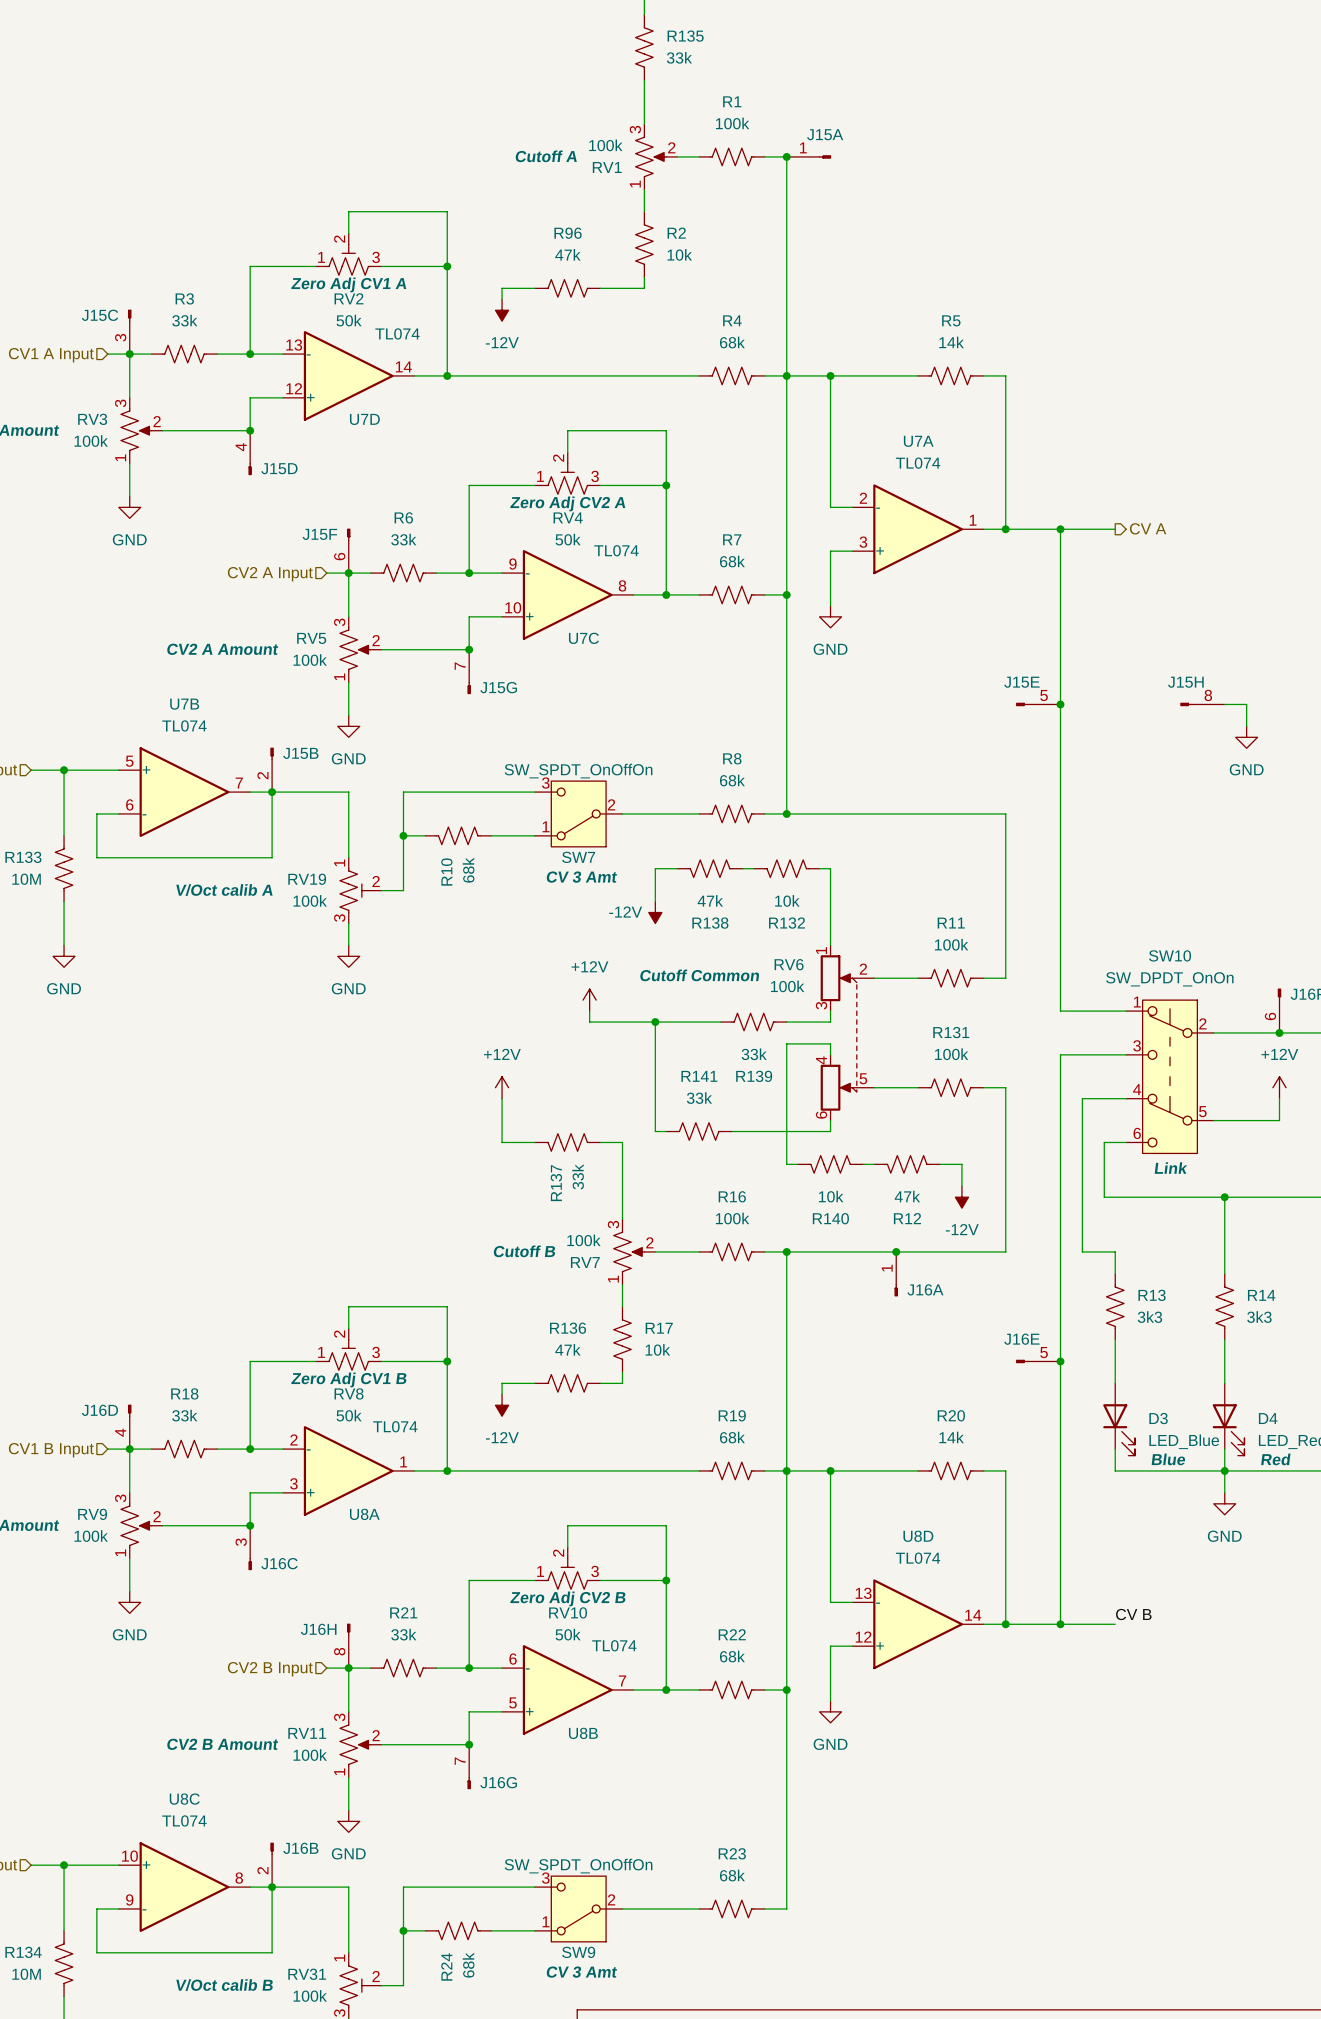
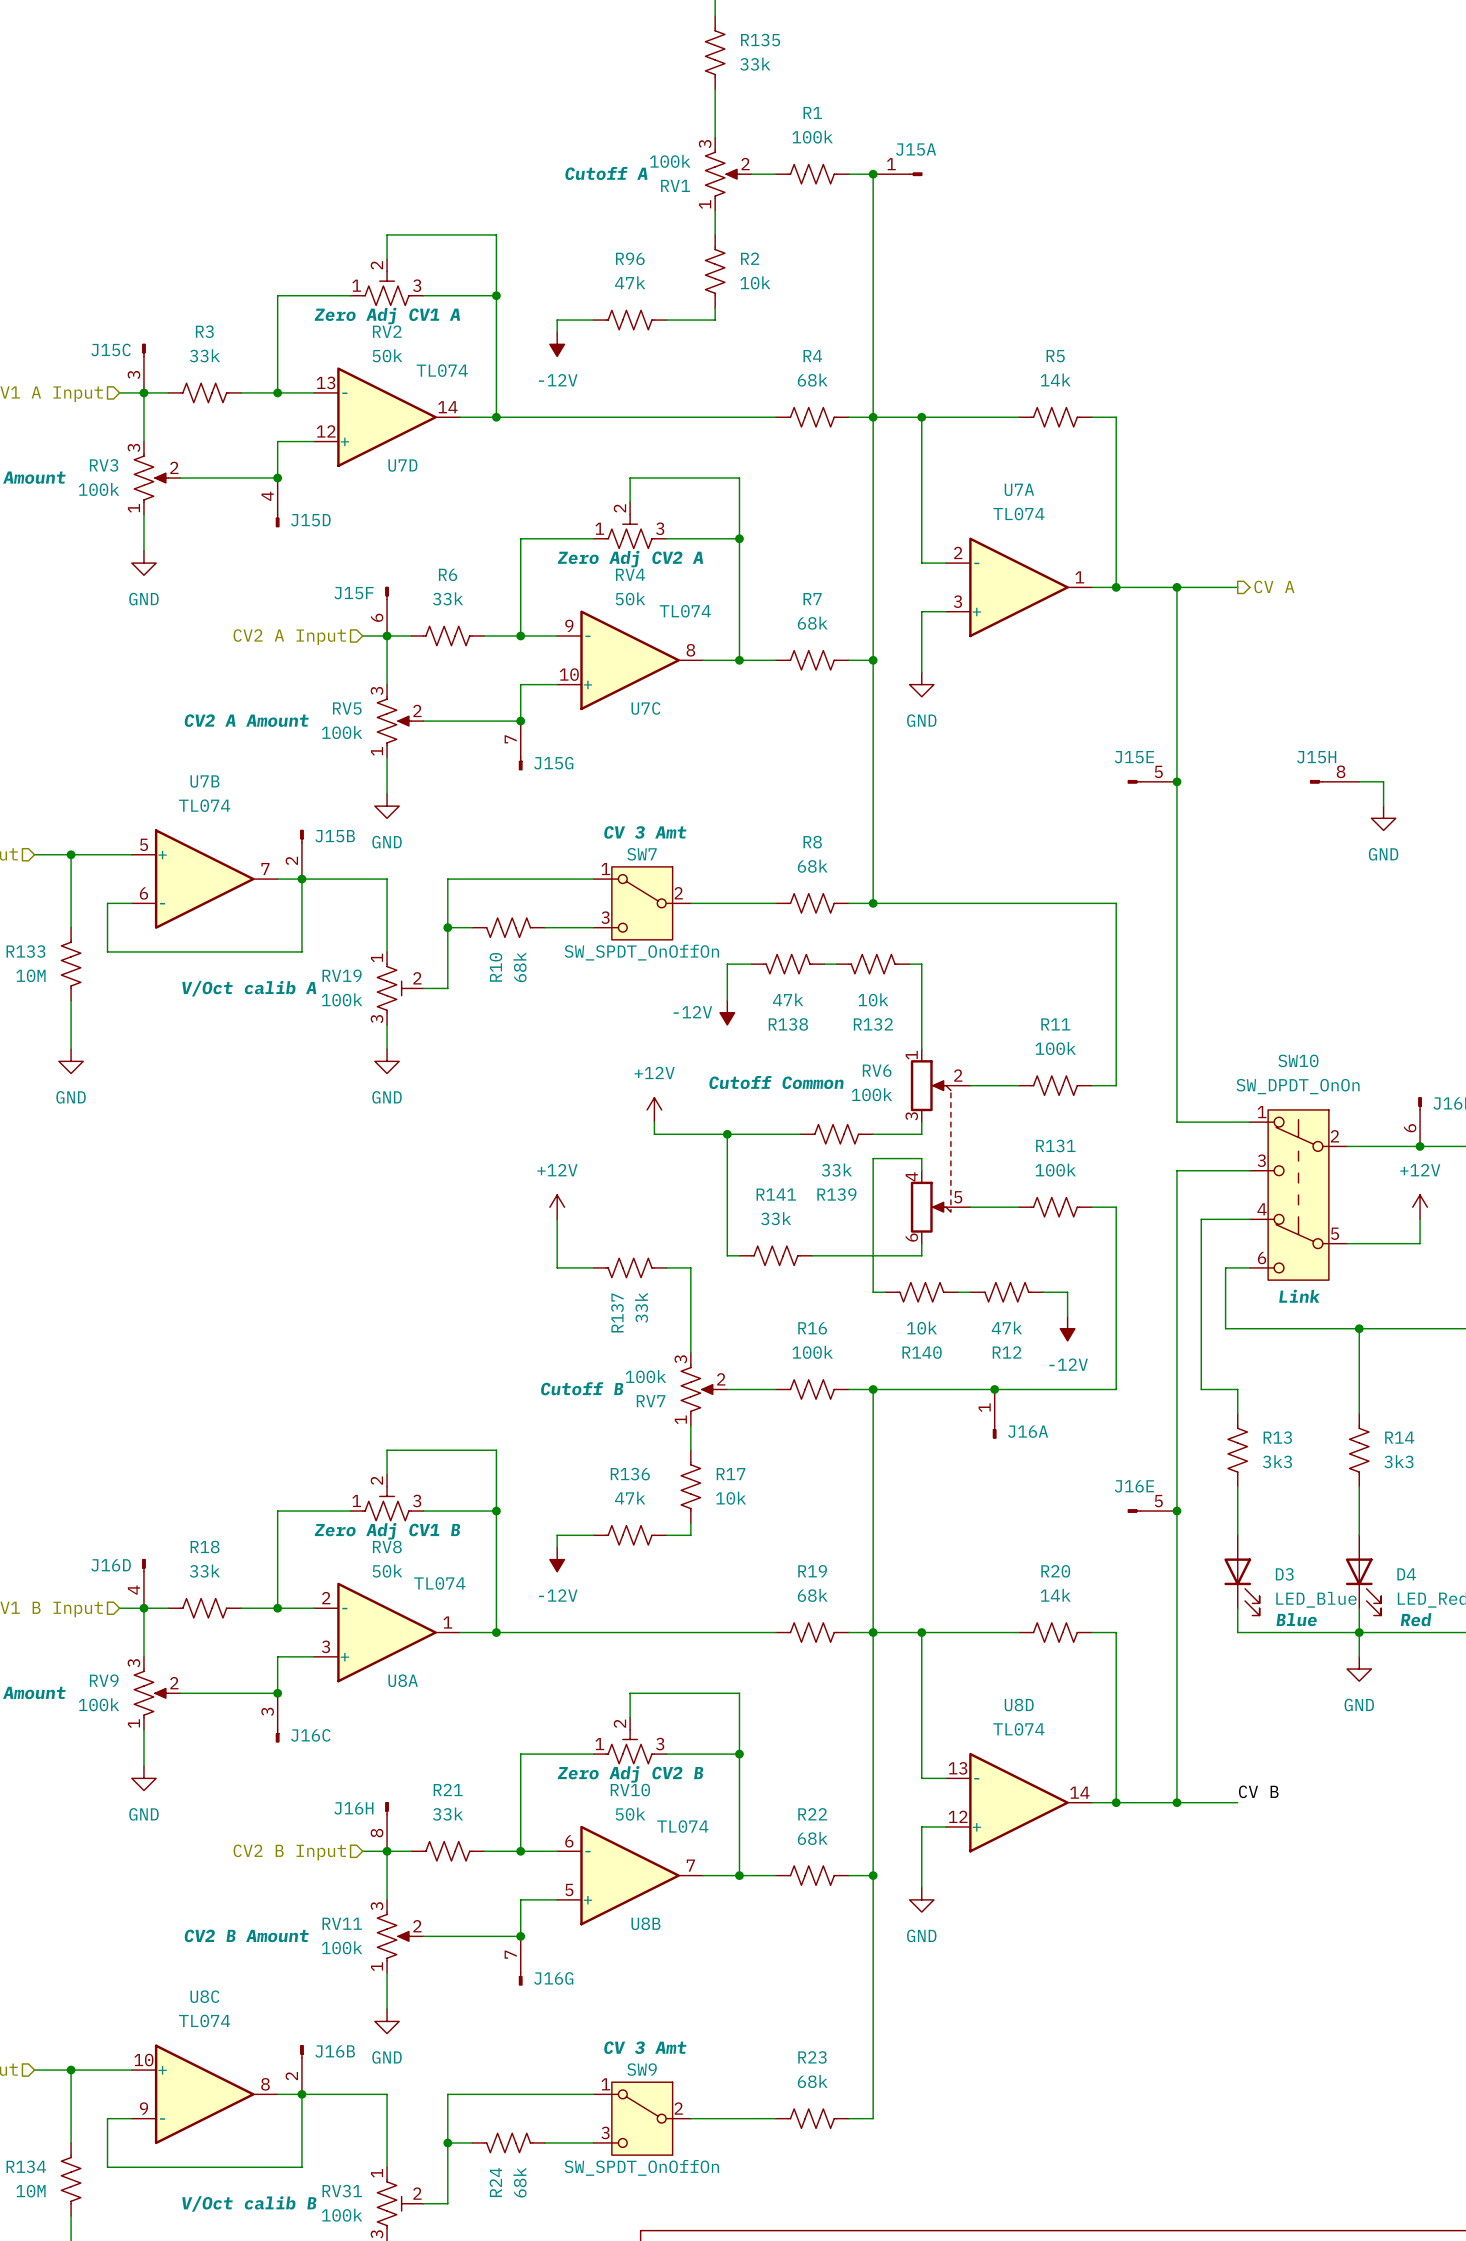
SW7 flip: as is (578, 813) -> up-down (642, 903)
SW9 flip: as is (578, 1908) -> up-down (642, 2118)

